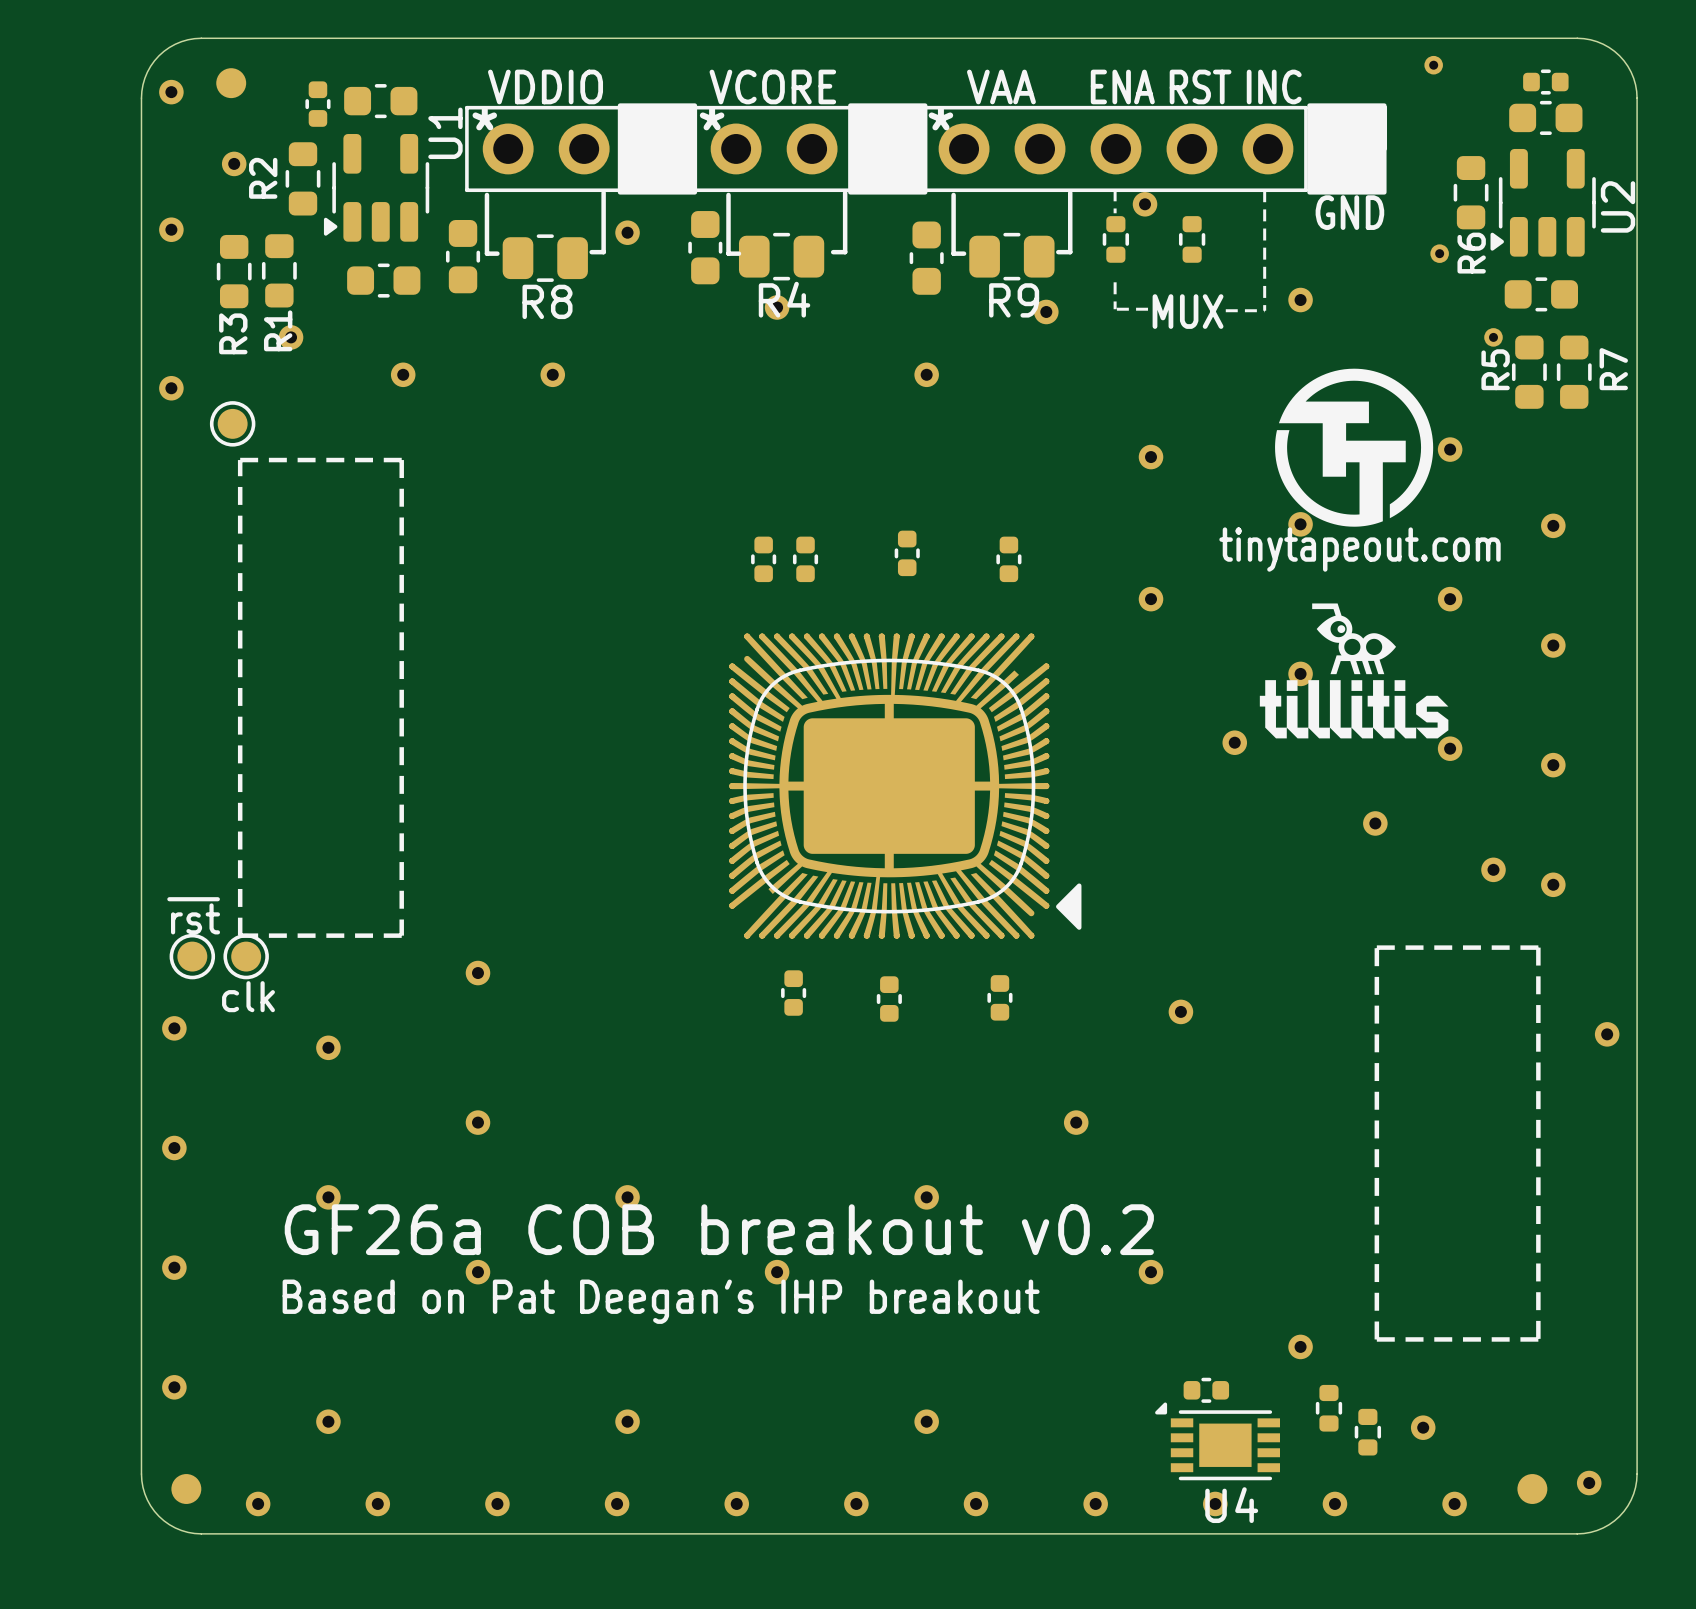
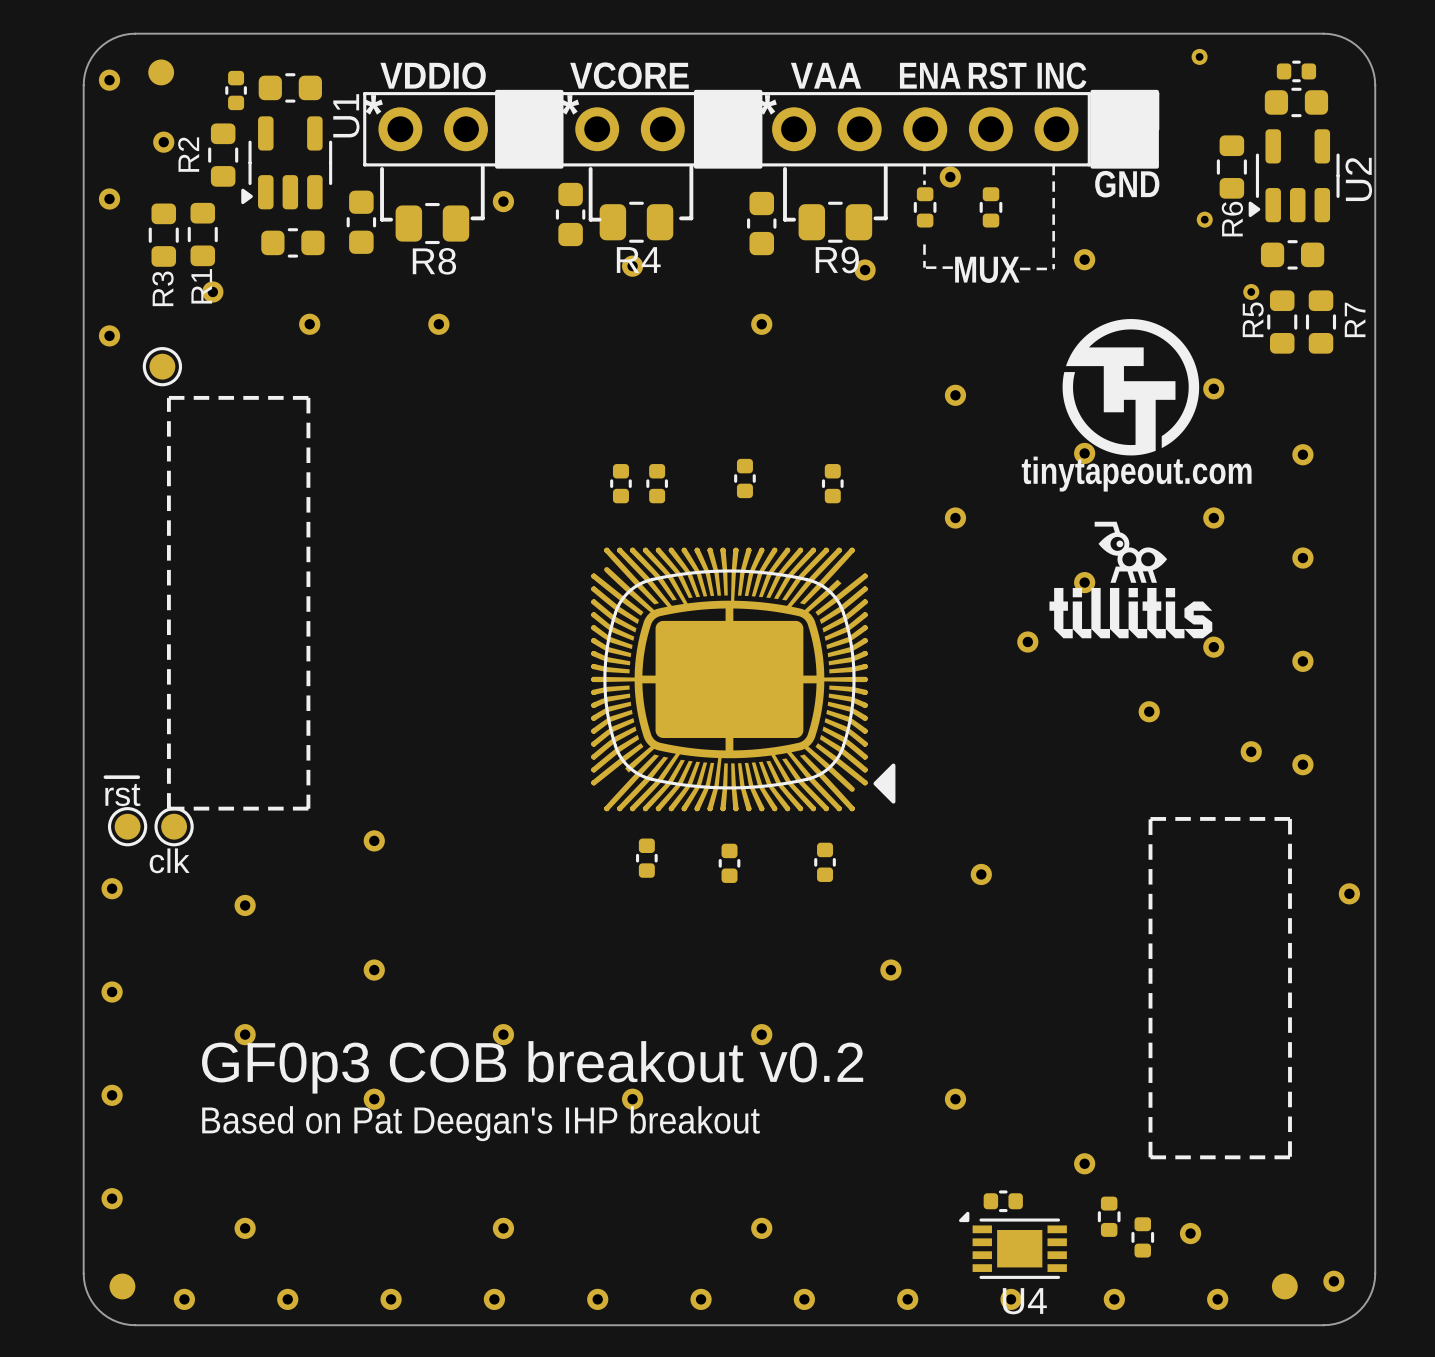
text: GF26a COB breakout v0.2 (719, 1229) -> GF0p3 COB breakout v0.2 (532, 1067)

